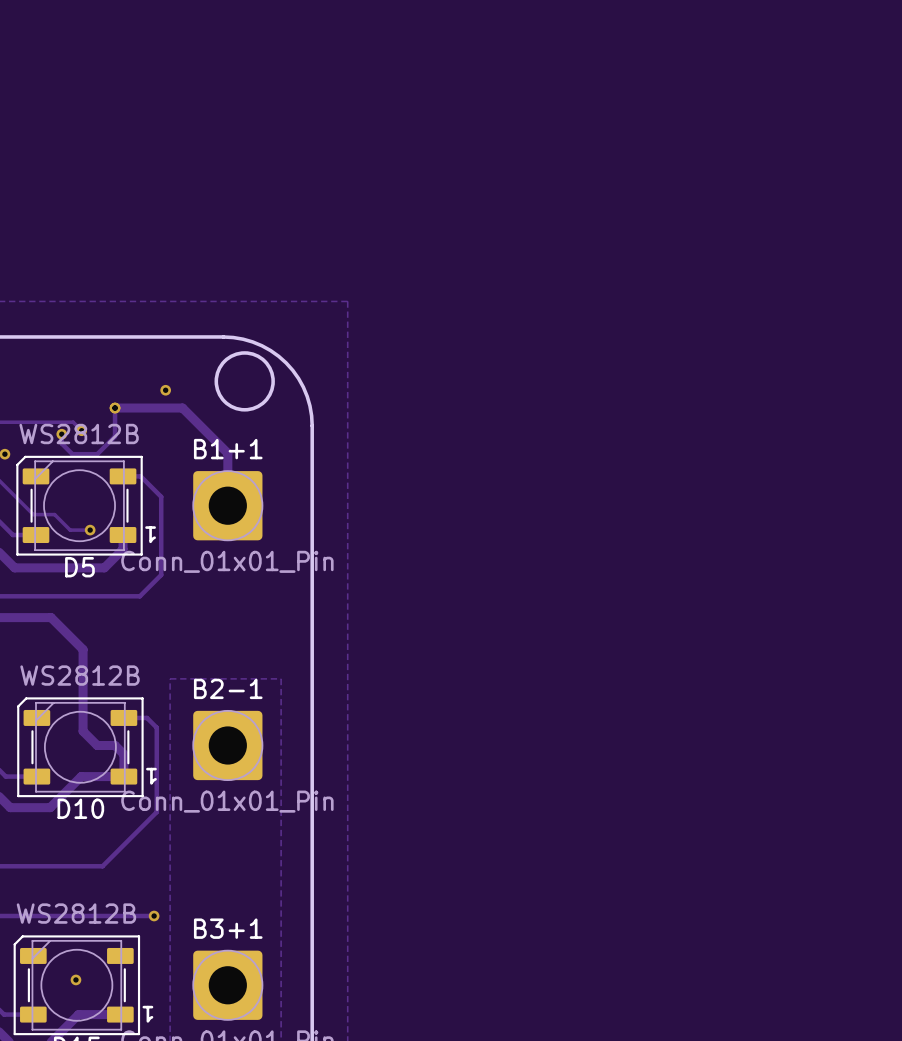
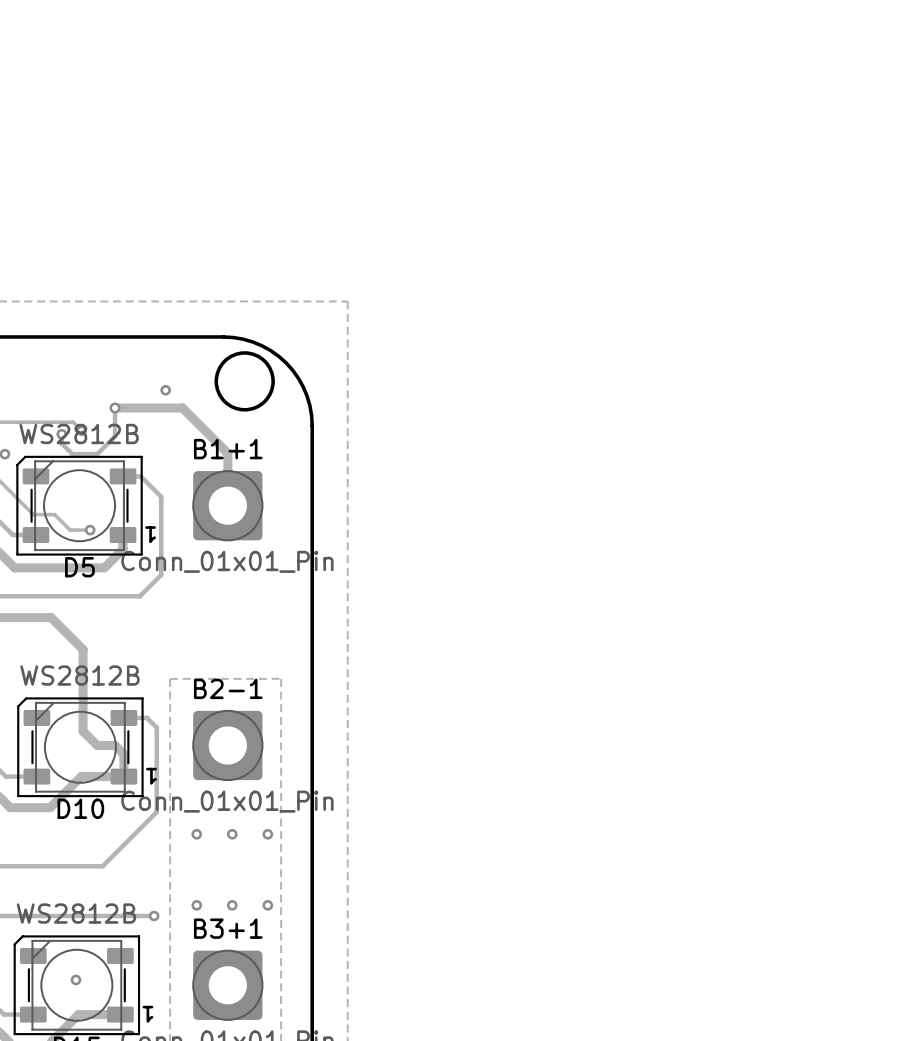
via: none -> (196, 834)
via: none -> (232, 834)
via: none -> (267, 834)
via: none -> (196, 905)
via: none -> (232, 905)
via: none -> (267, 905)

